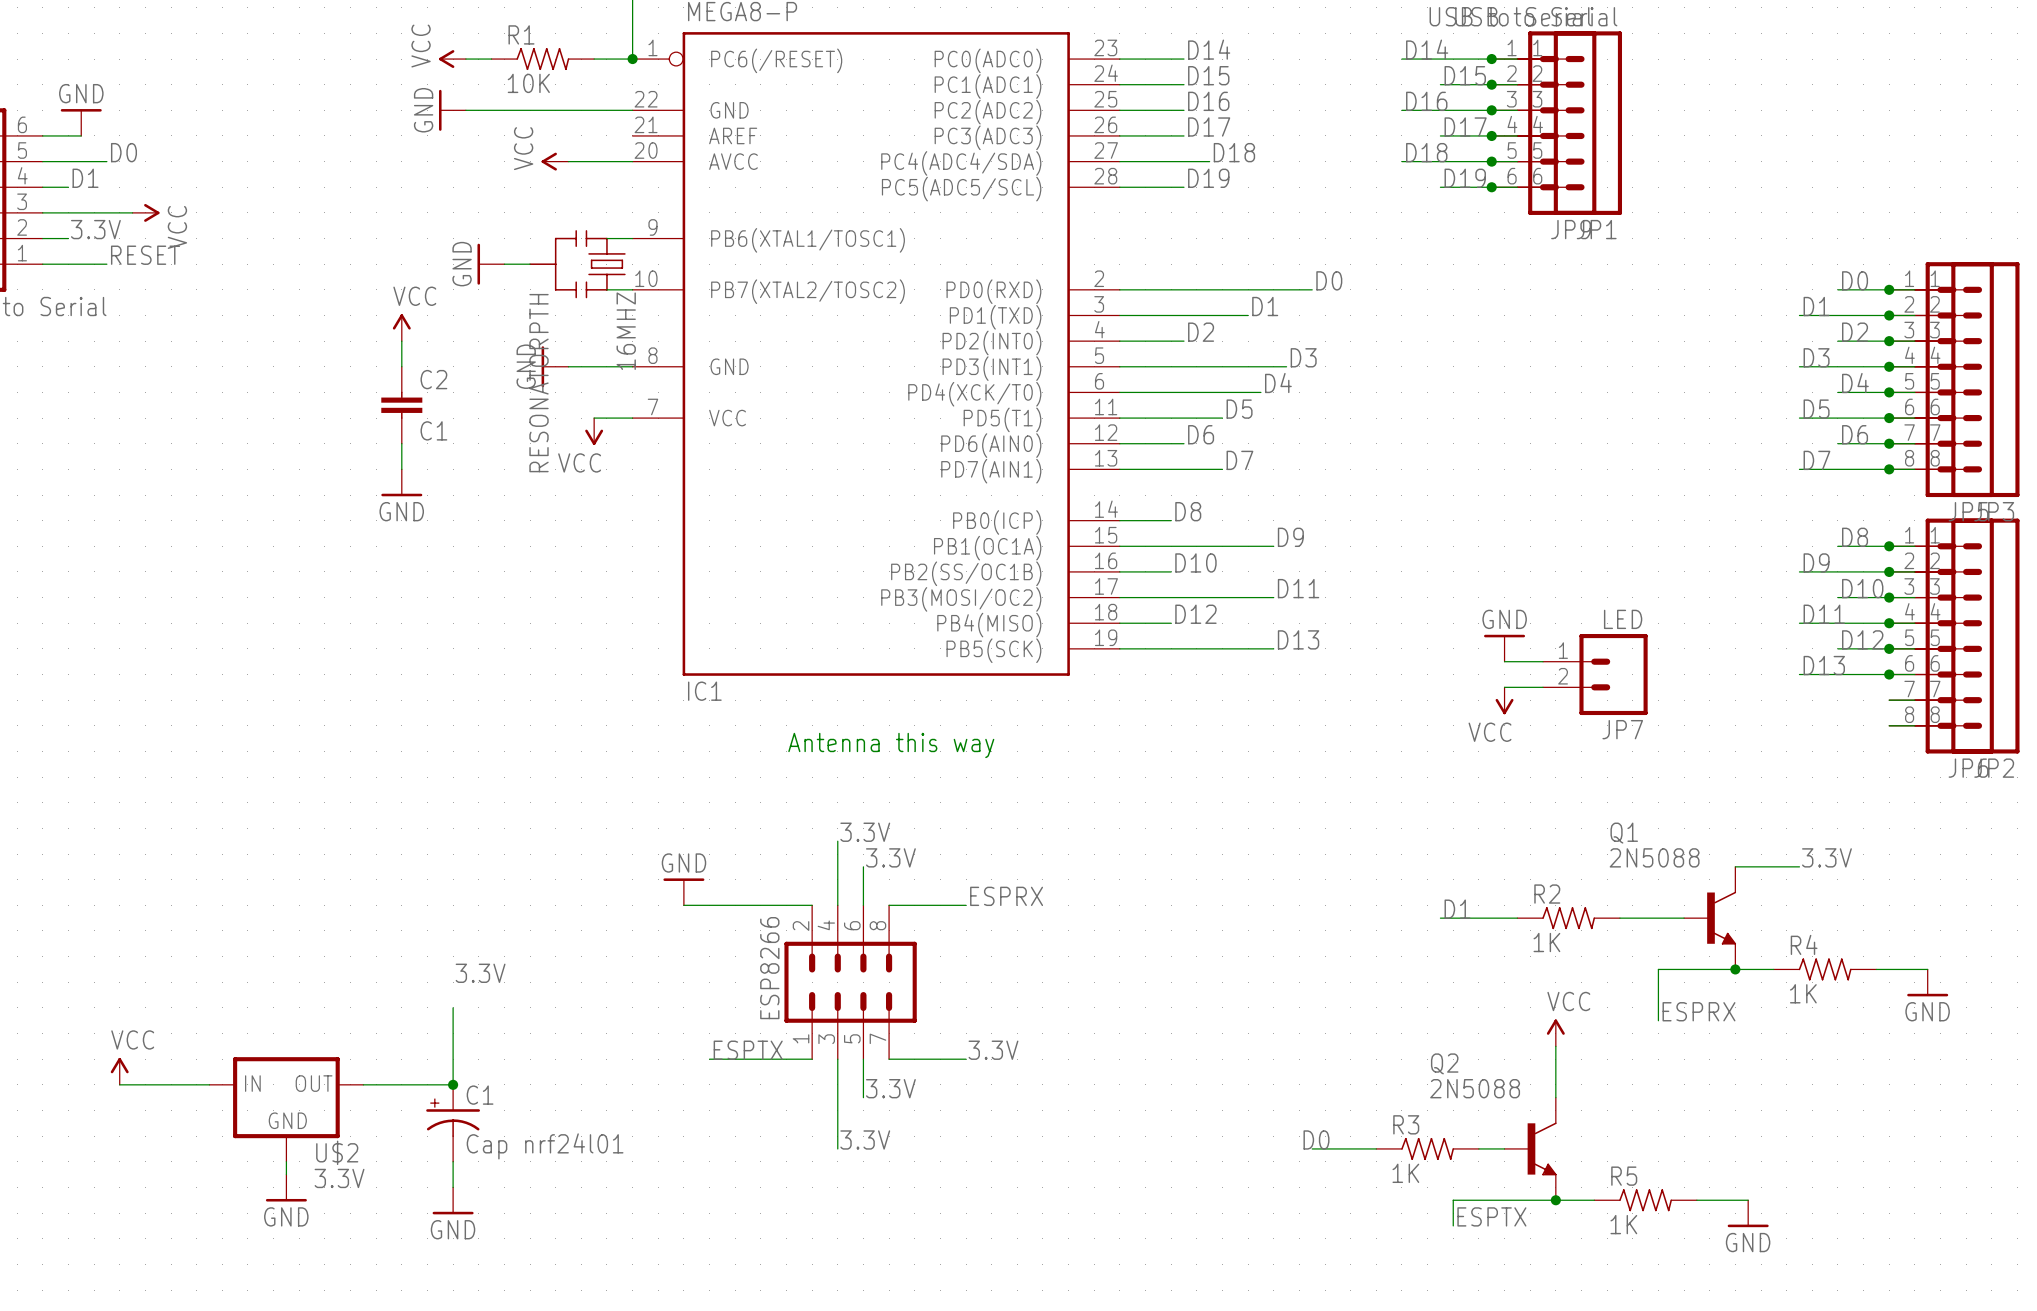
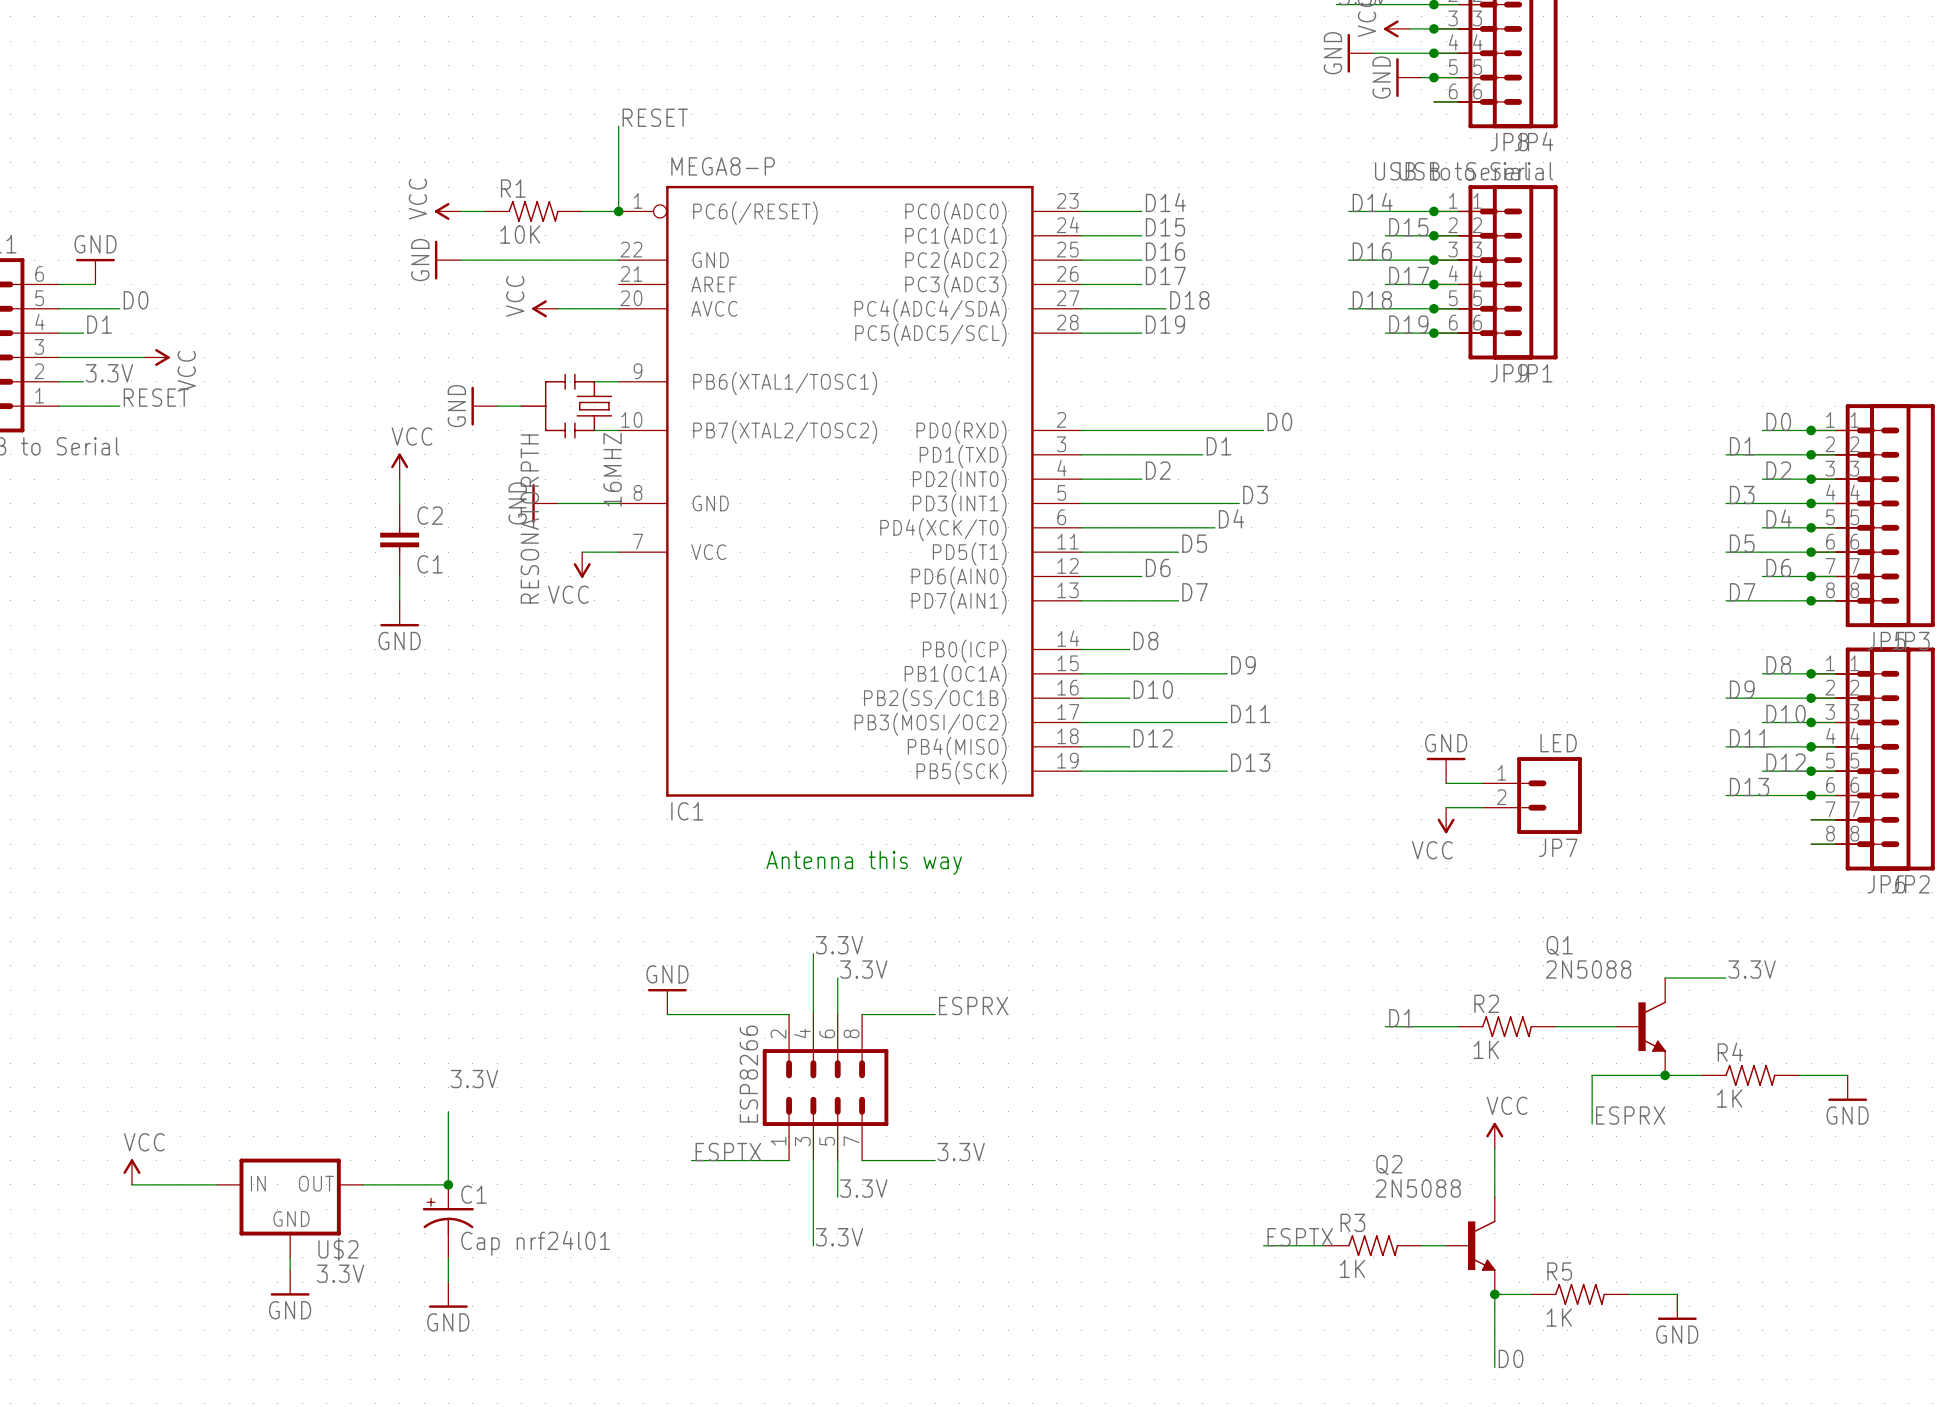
label: D0 (1316, 1139) -> none
wire: (1555, 1200) (1453, 1200) (1453, 1225) -> (1494, 1294) (1494, 1367)
label position: ESPTX (1491, 1216) -> ESPTX (1300, 1237)
label: none -> D0 (1511, 1358)

